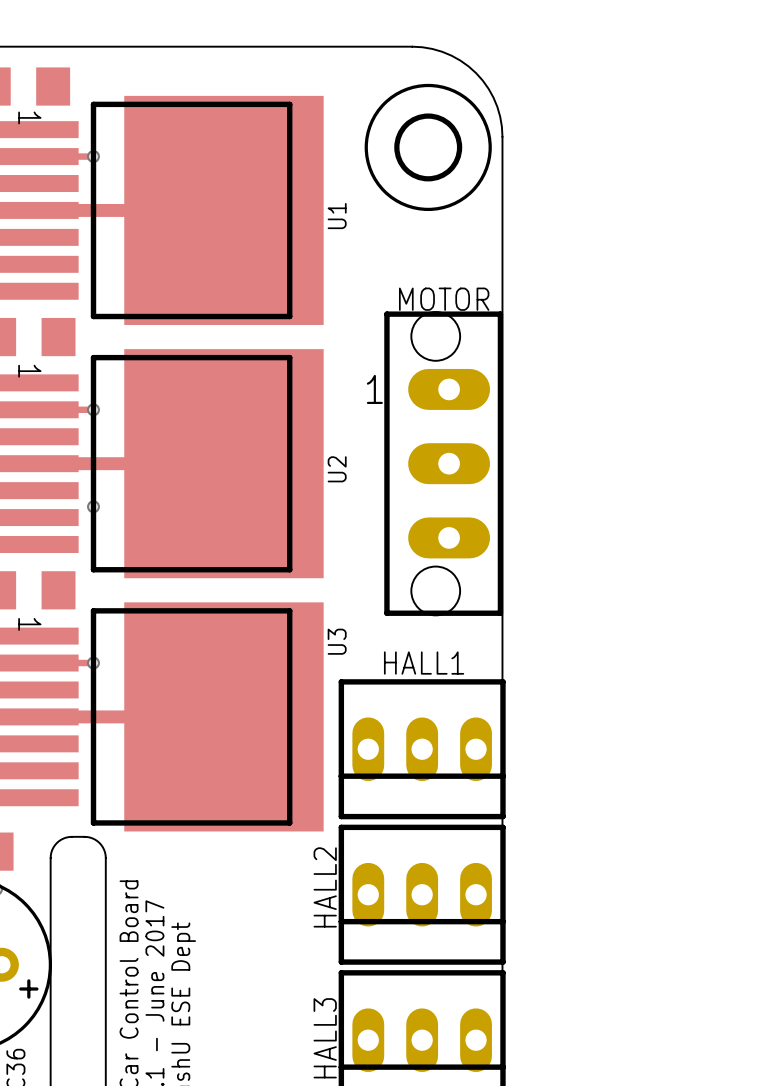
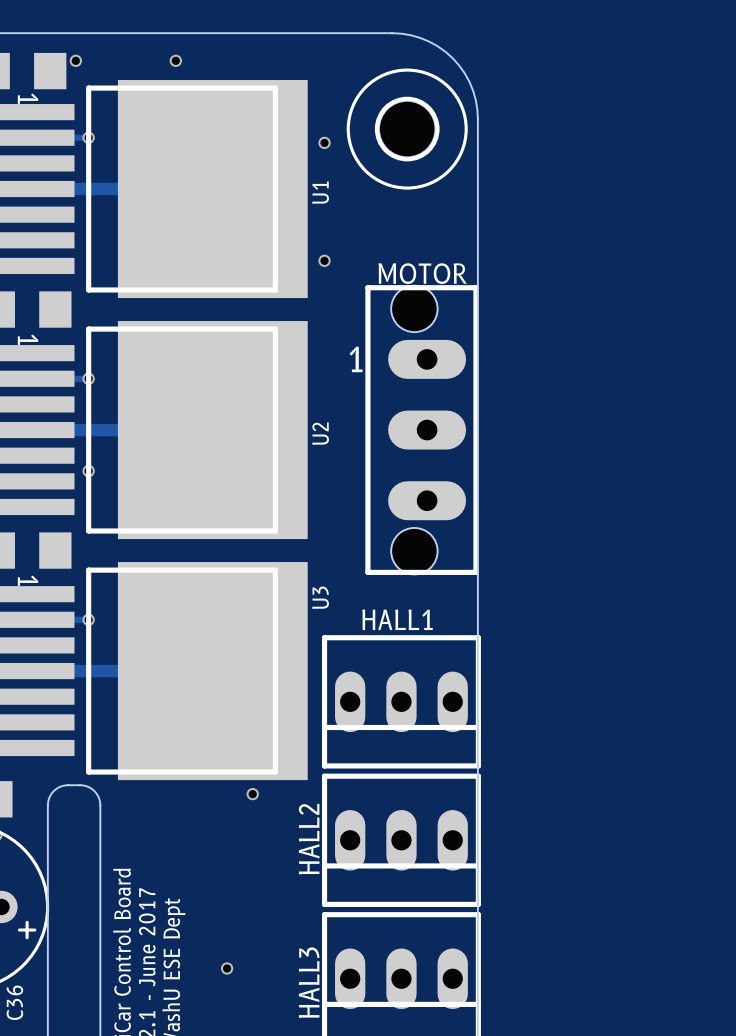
via: none -> (75, 60)
via: none -> (175, 60)
via: none -> (324, 142)
via: none -> (324, 260)
via: none -> (252, 794)
via: none -> (227, 968)

